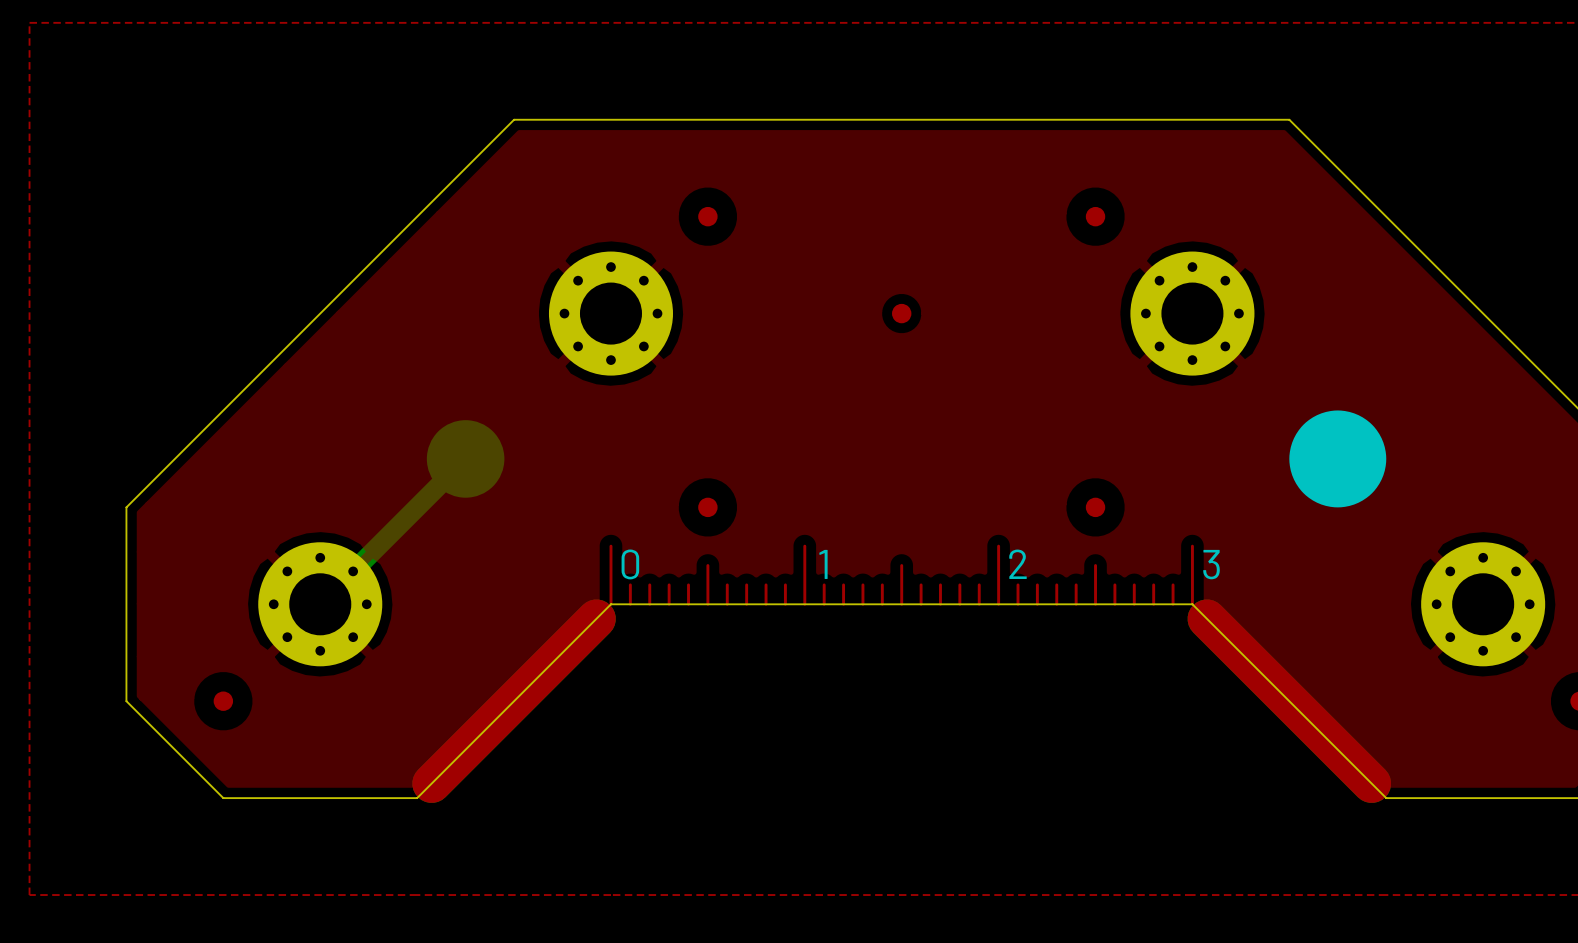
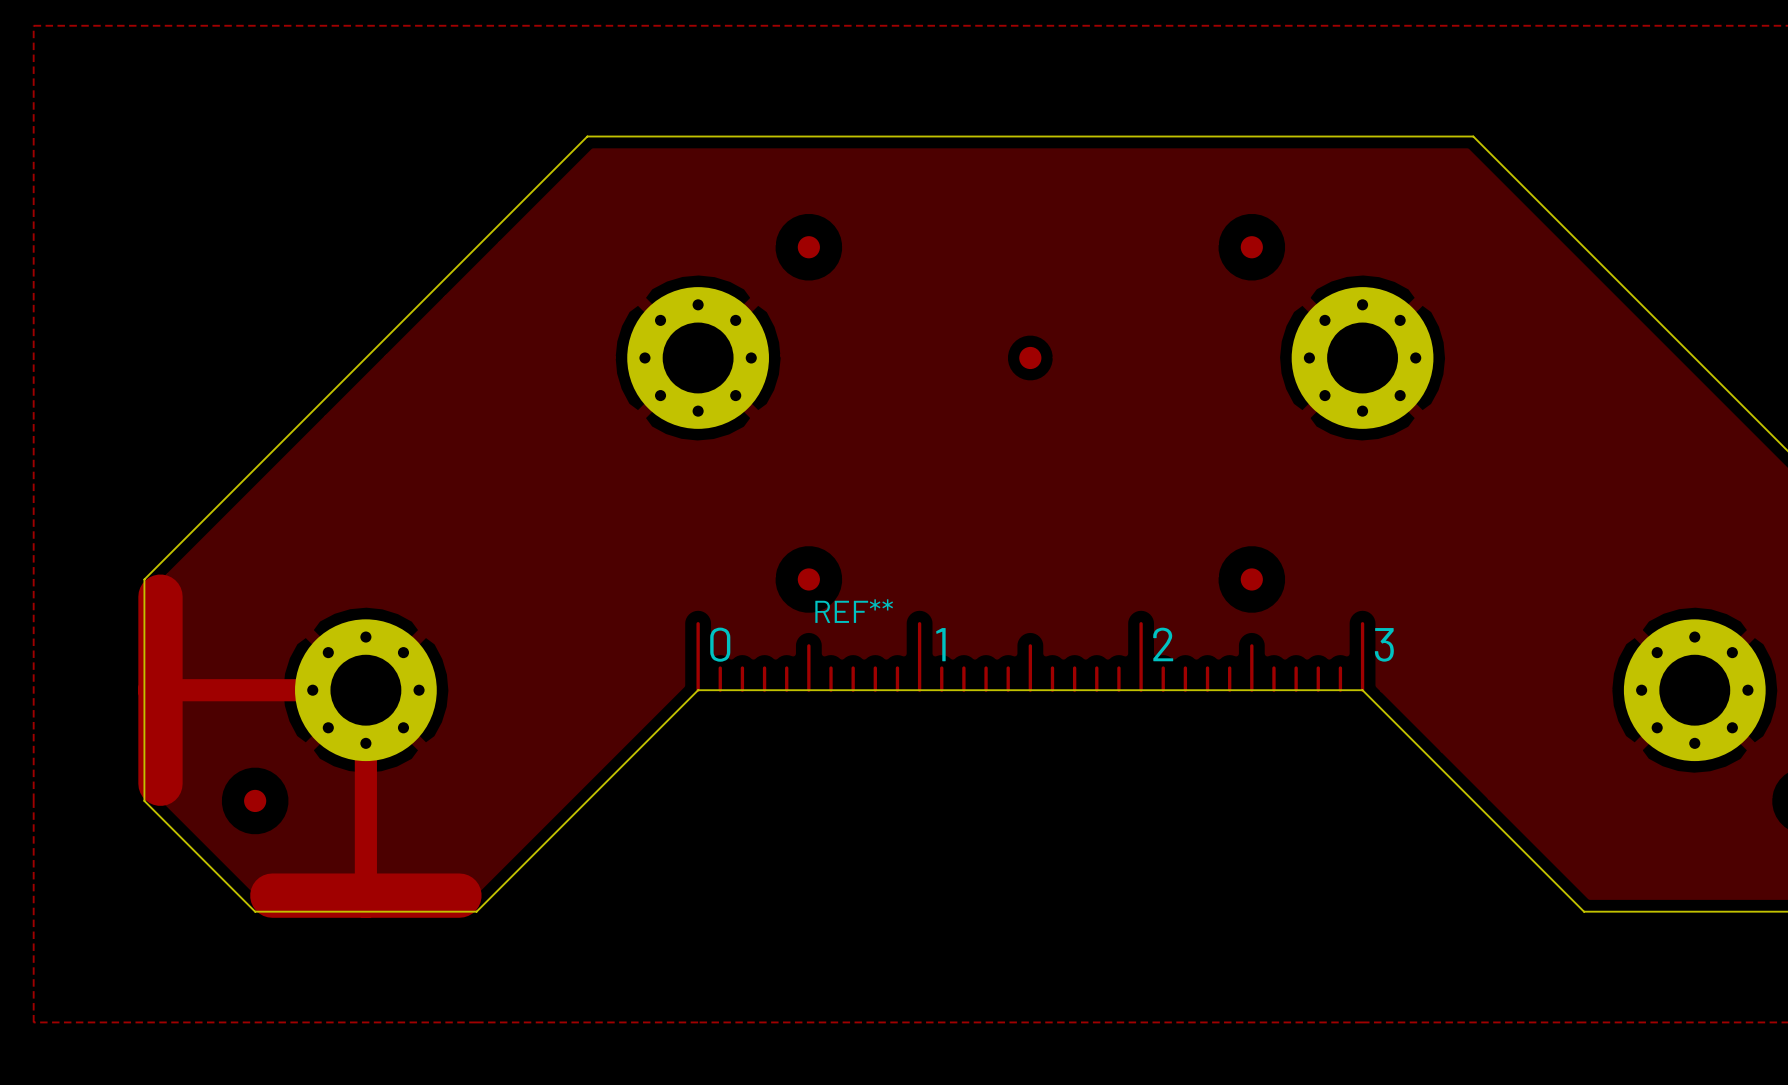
drawing: [1289, 410, 1387, 508] -> none
bottom track: (465, 458) (320, 604) -> none
part: (465, 458) -> none
top track: none -> (160, 596) (160, 783)
drawing: [609, 544, 1194, 606] -> none
REF**: none -> (1030, 656)
top track: none -> (160, 690) (365, 690) (365, 895)
top track: (596, 618) (431, 783) -> none
top track: (1206, 618) (1371, 783) -> none
top track: none -> (272, 895) (459, 895)

